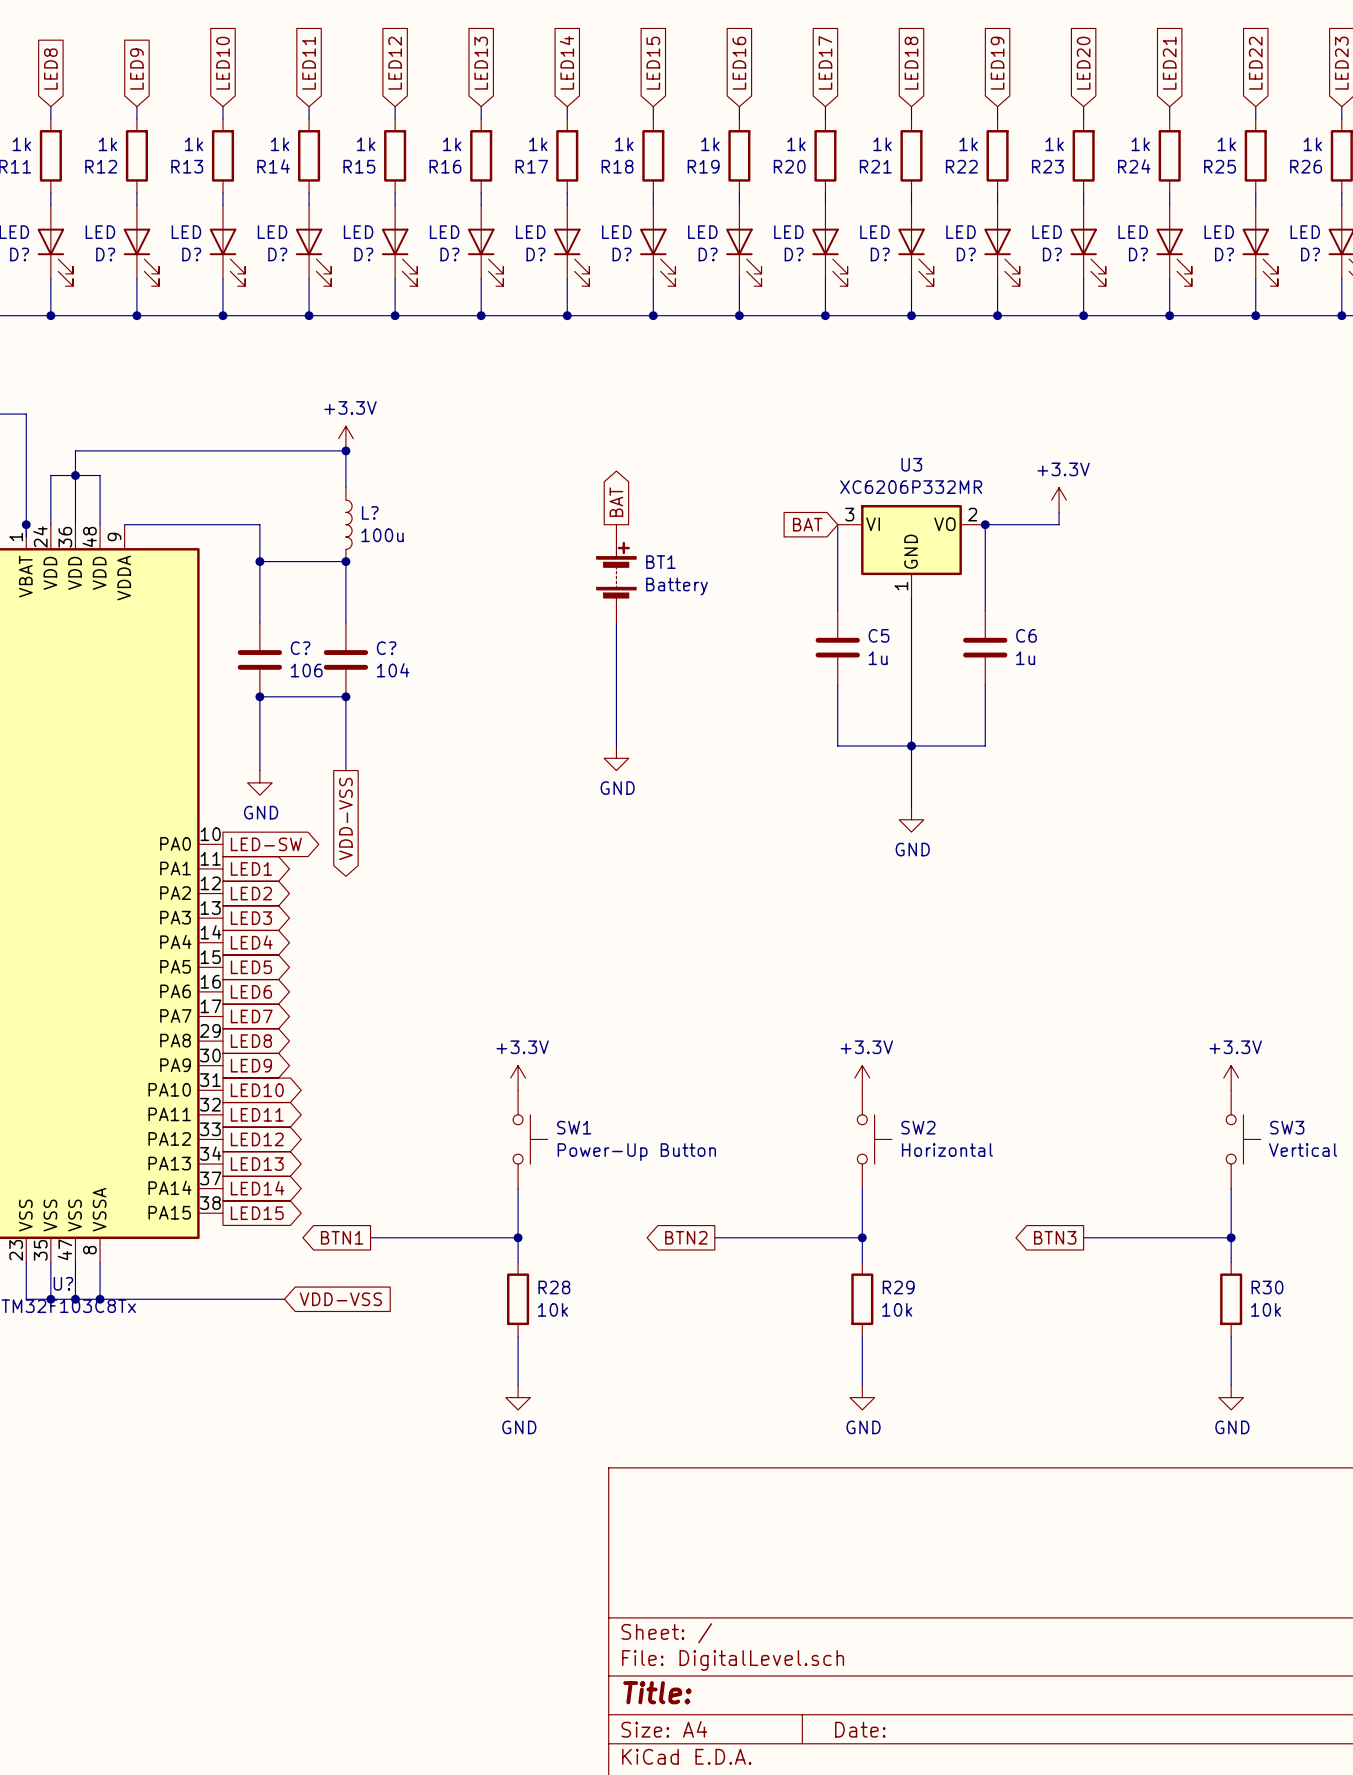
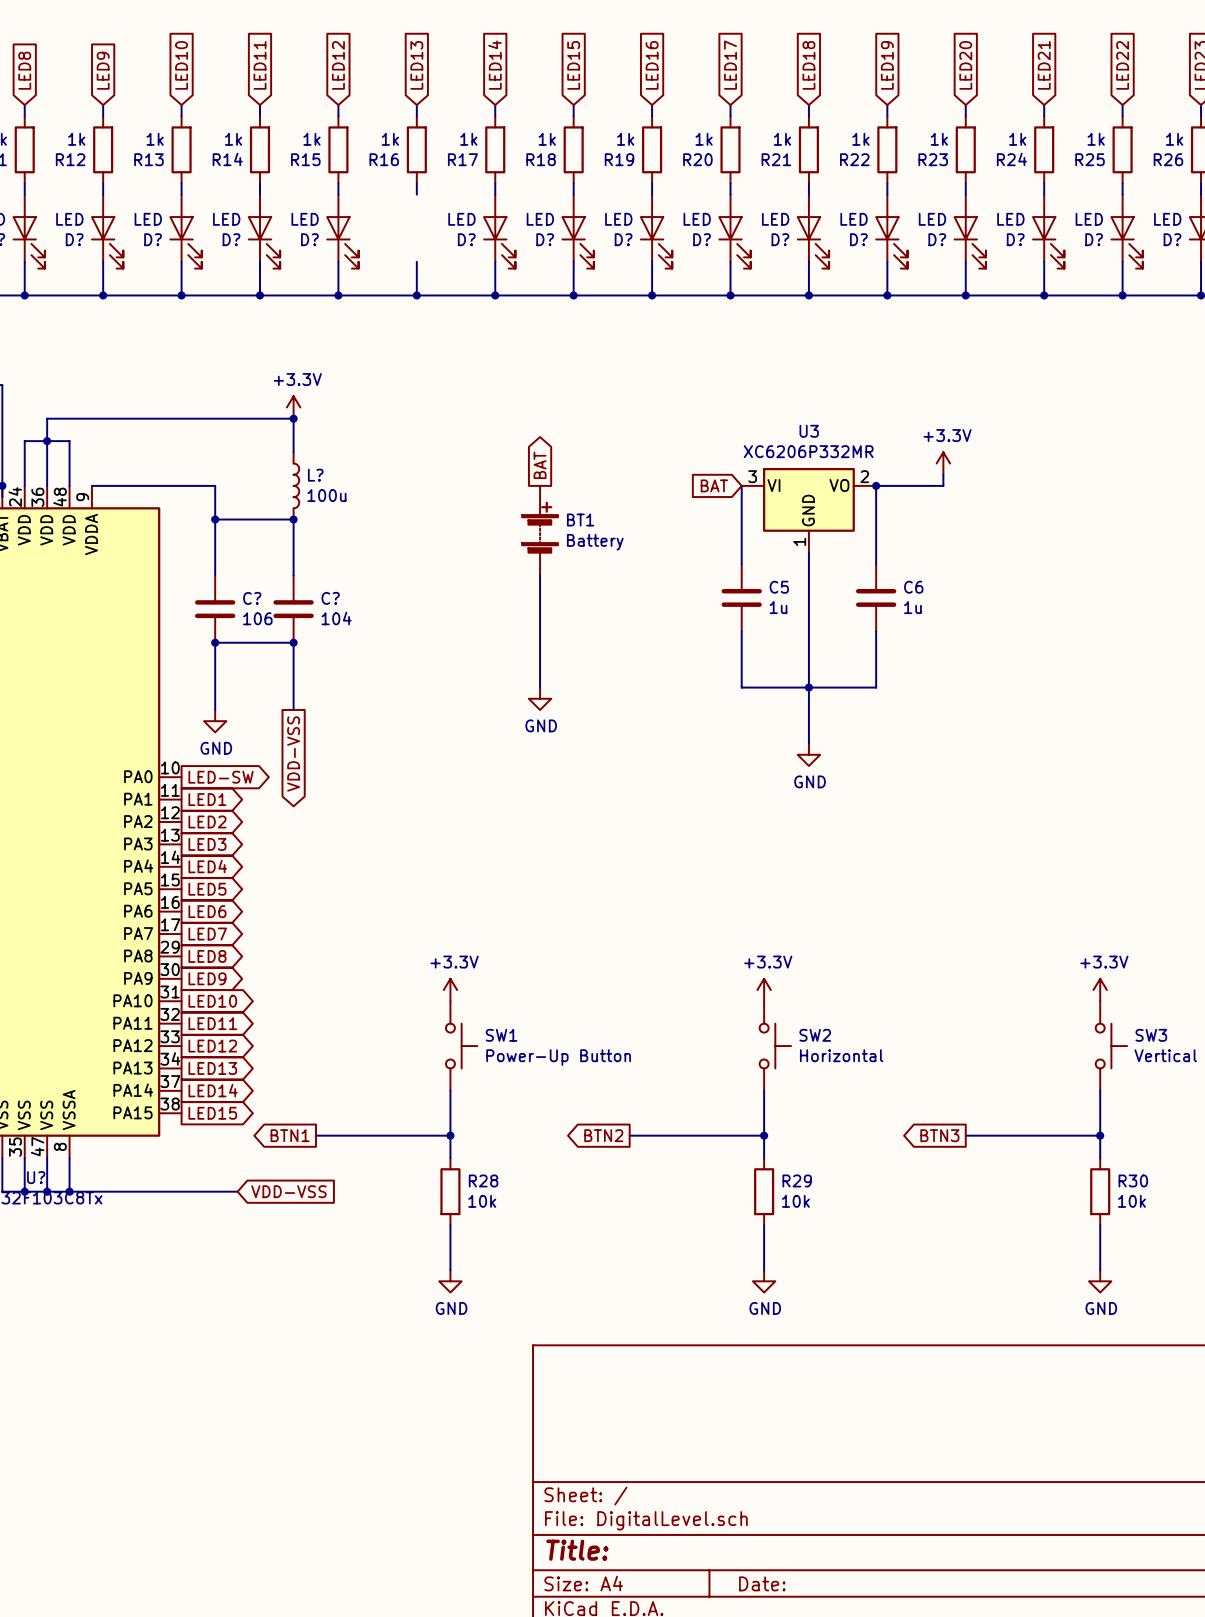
D?: LED (485, 245) -> none

